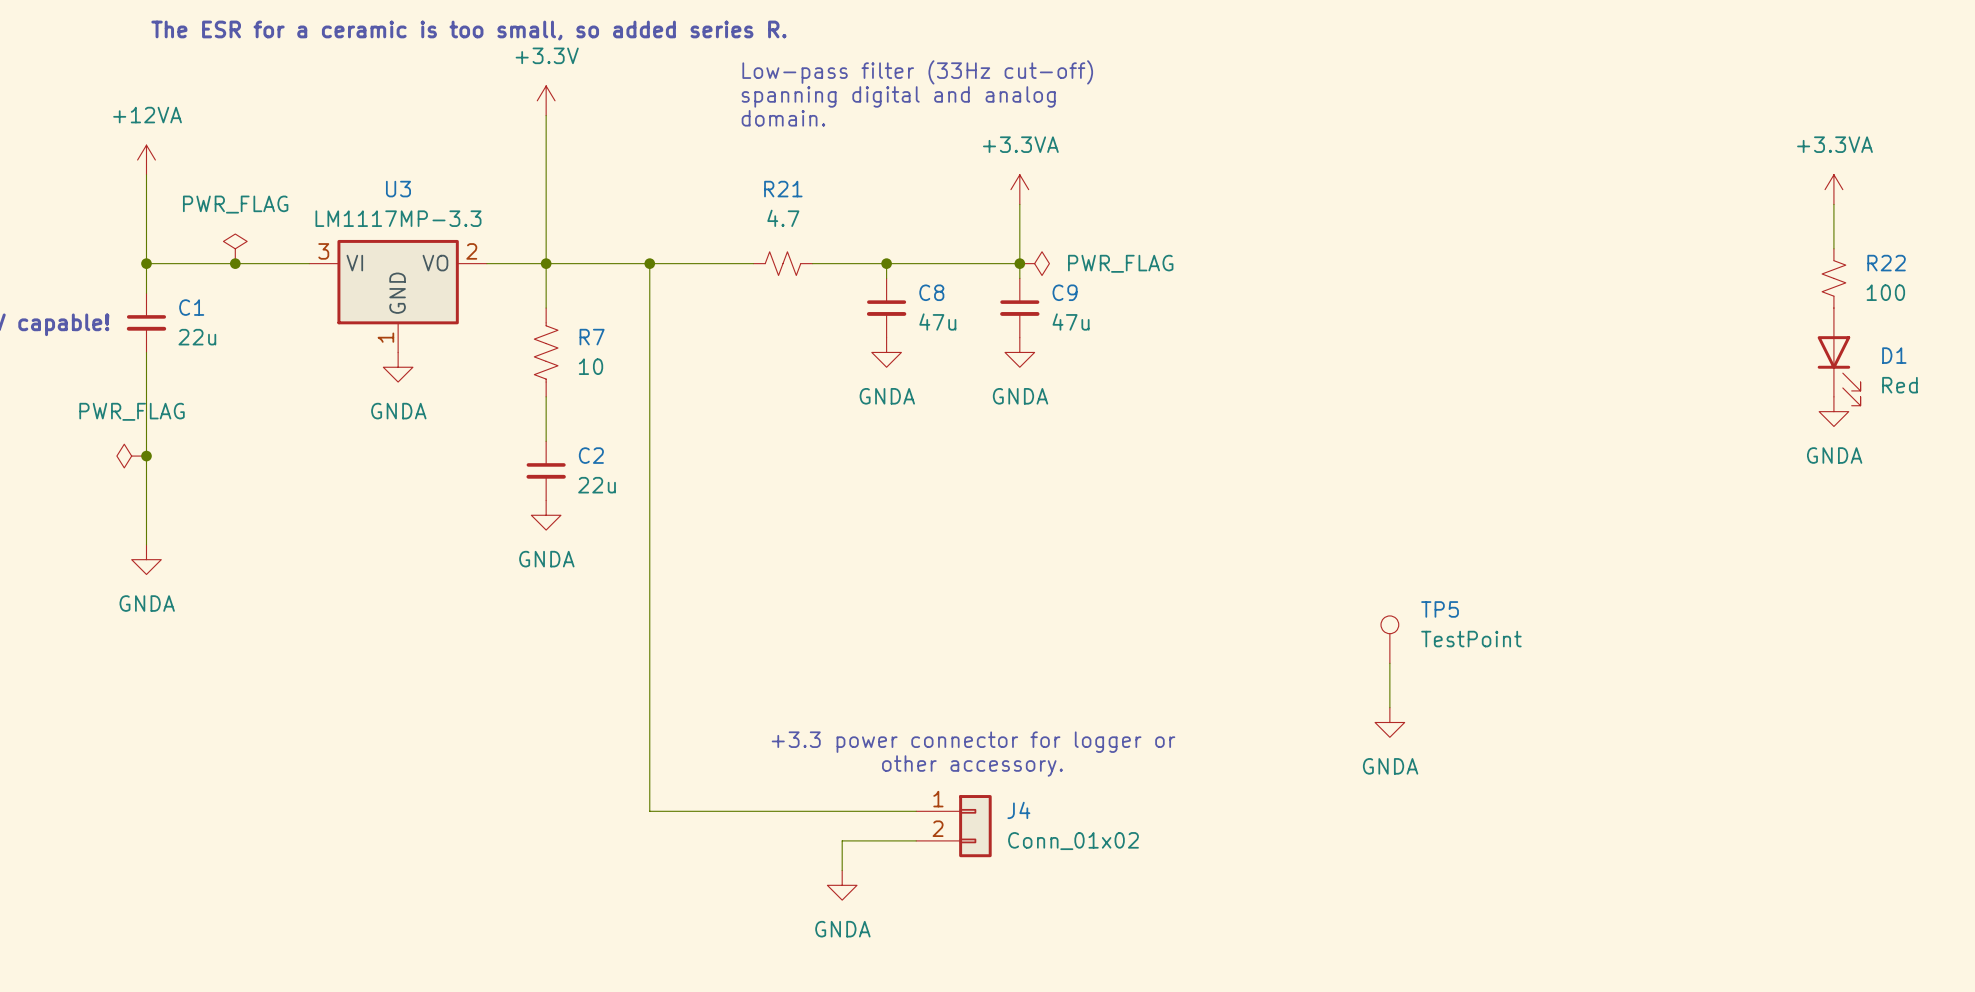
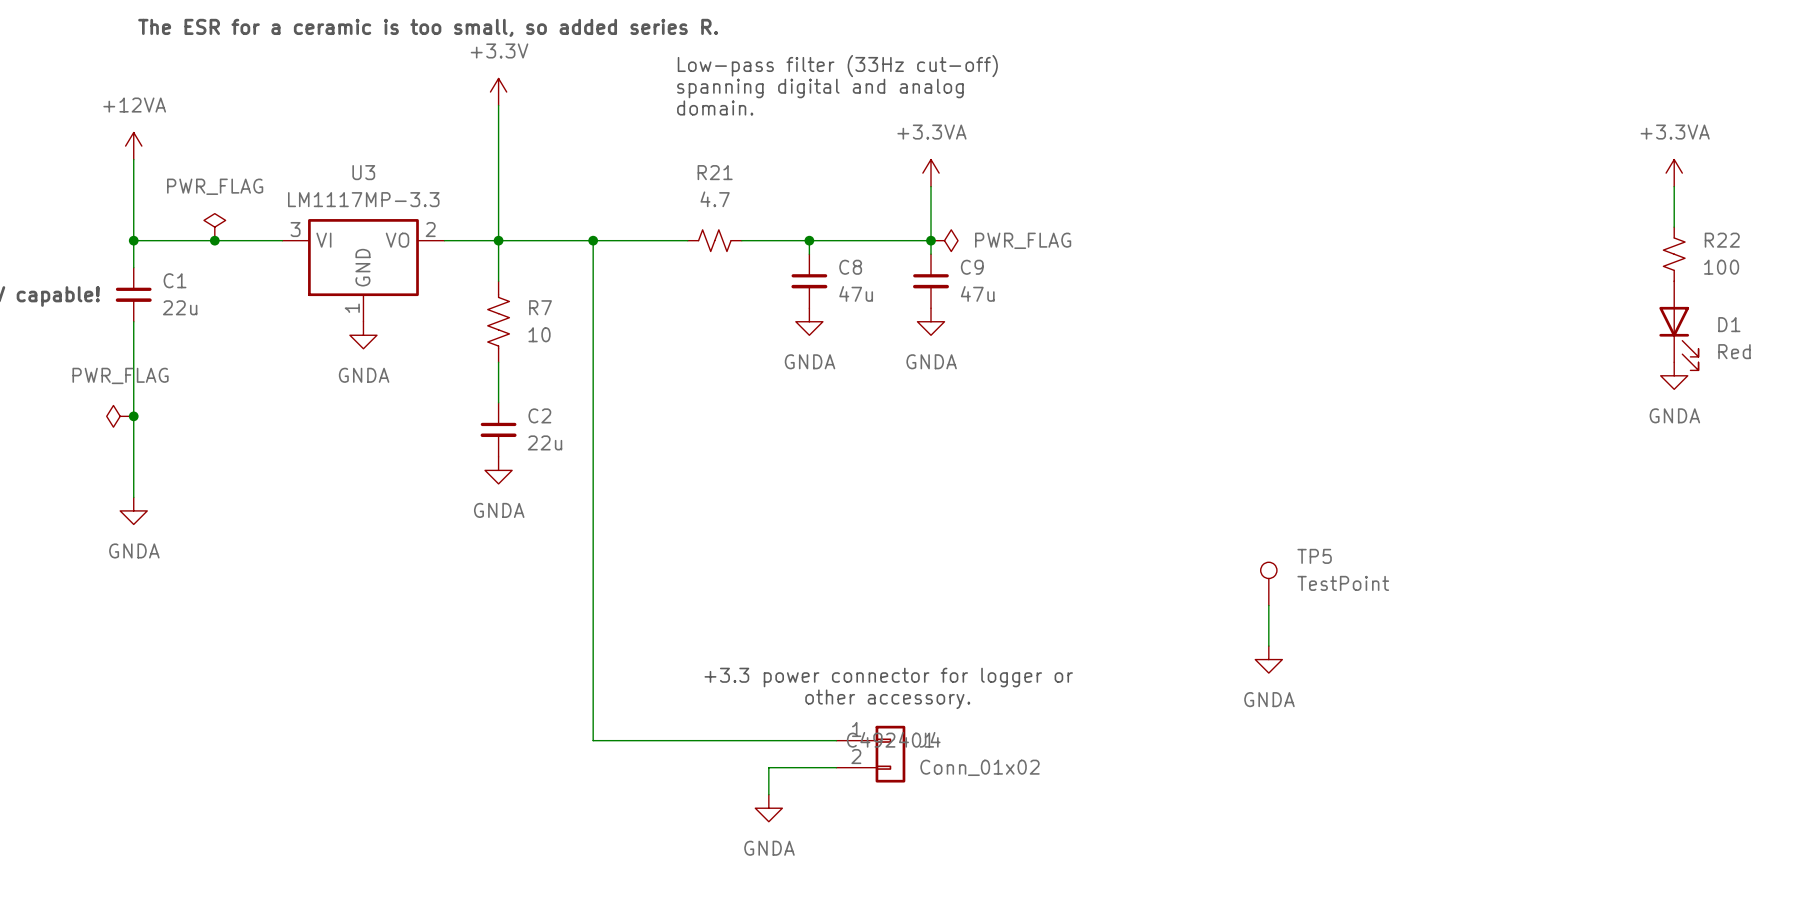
J4 text: none -> C492401 (890, 739)

